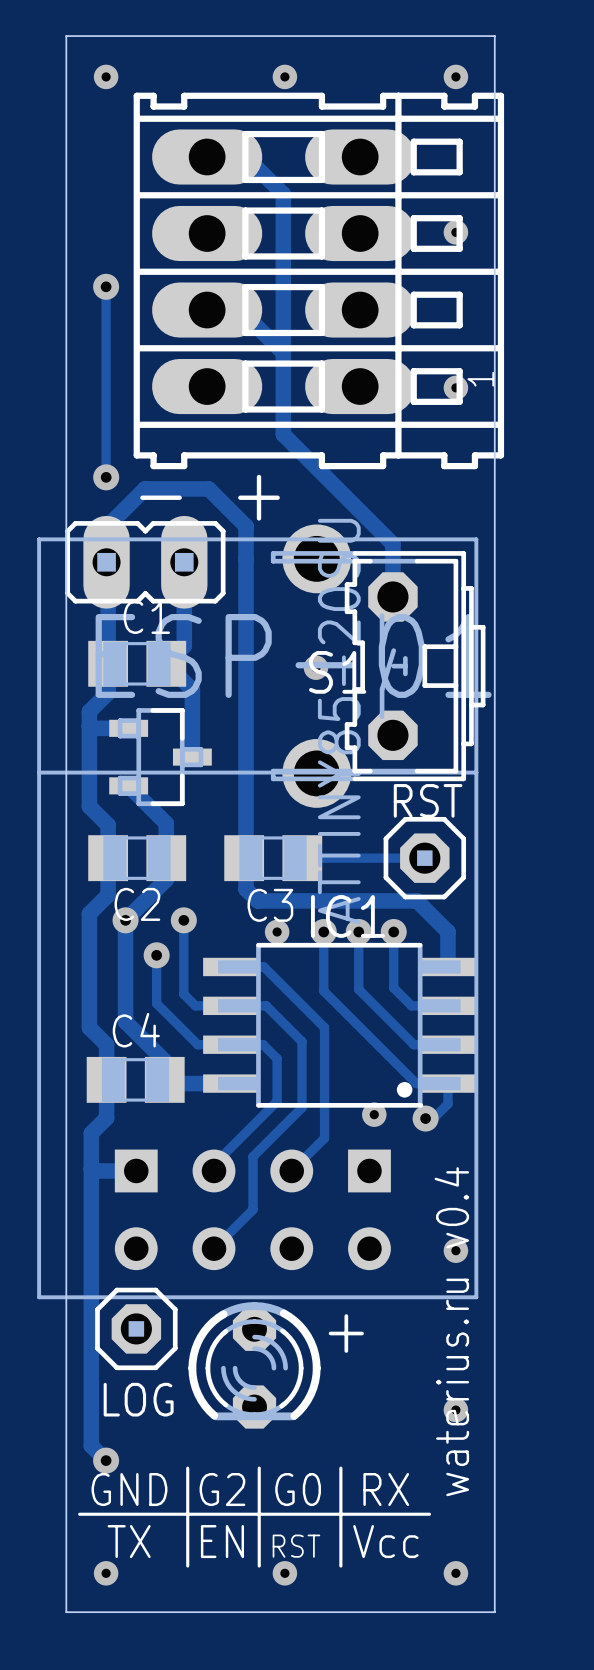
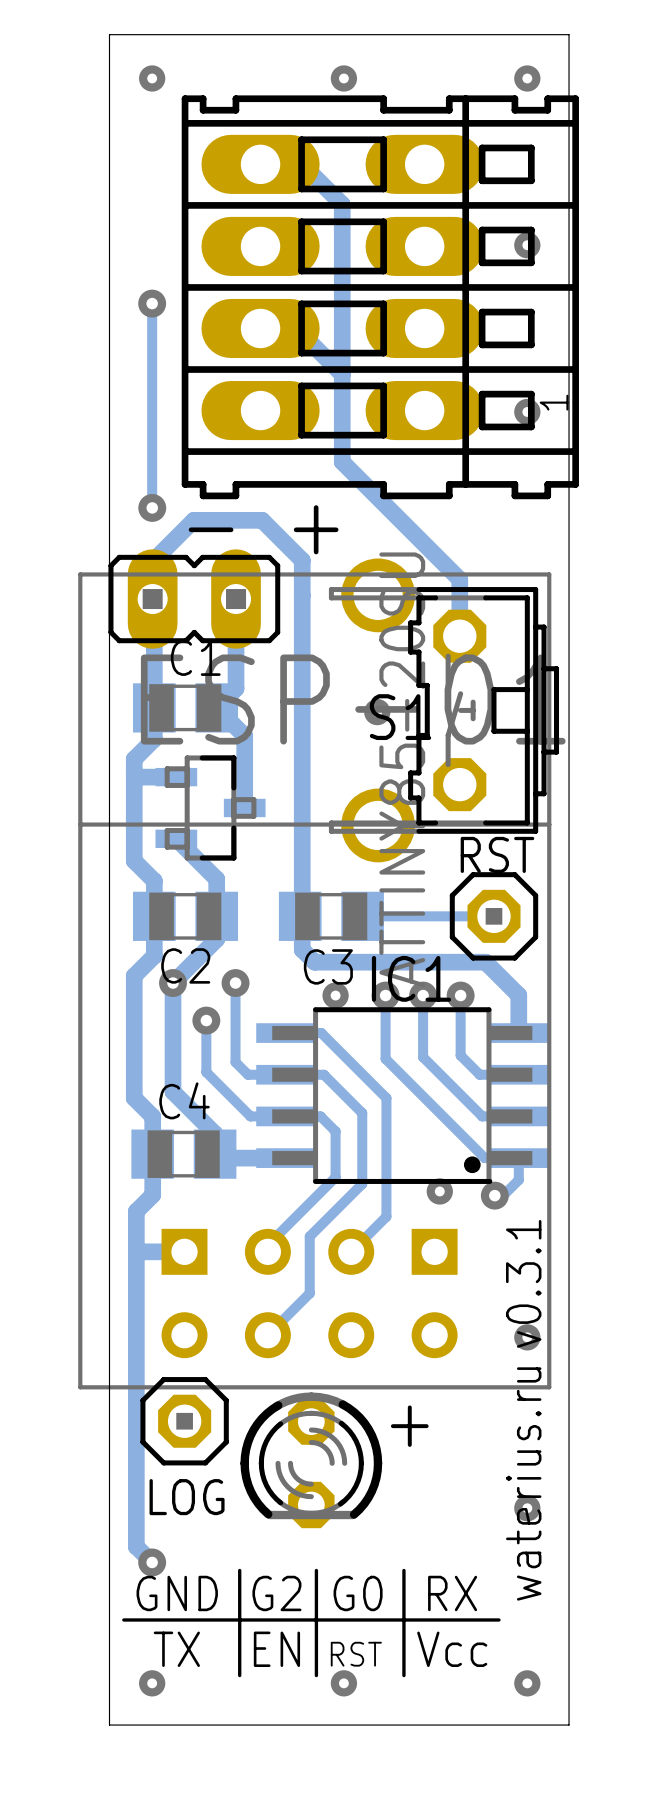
text: v0.4 (451, 1207) -> v0.3.1 (523, 1283)

